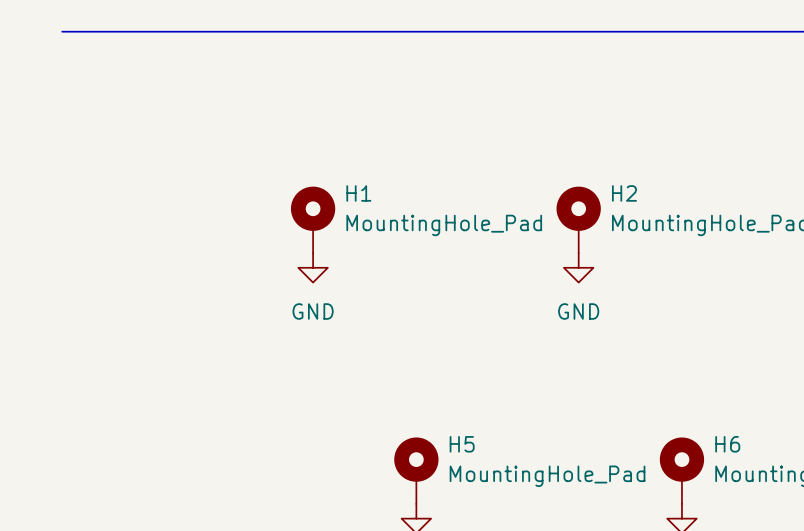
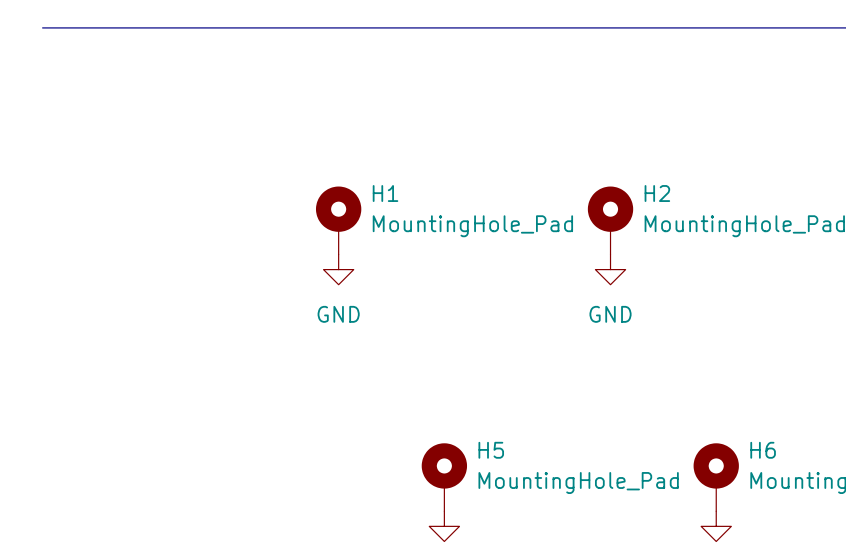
line: none -> (42, 27) (81, 27)

